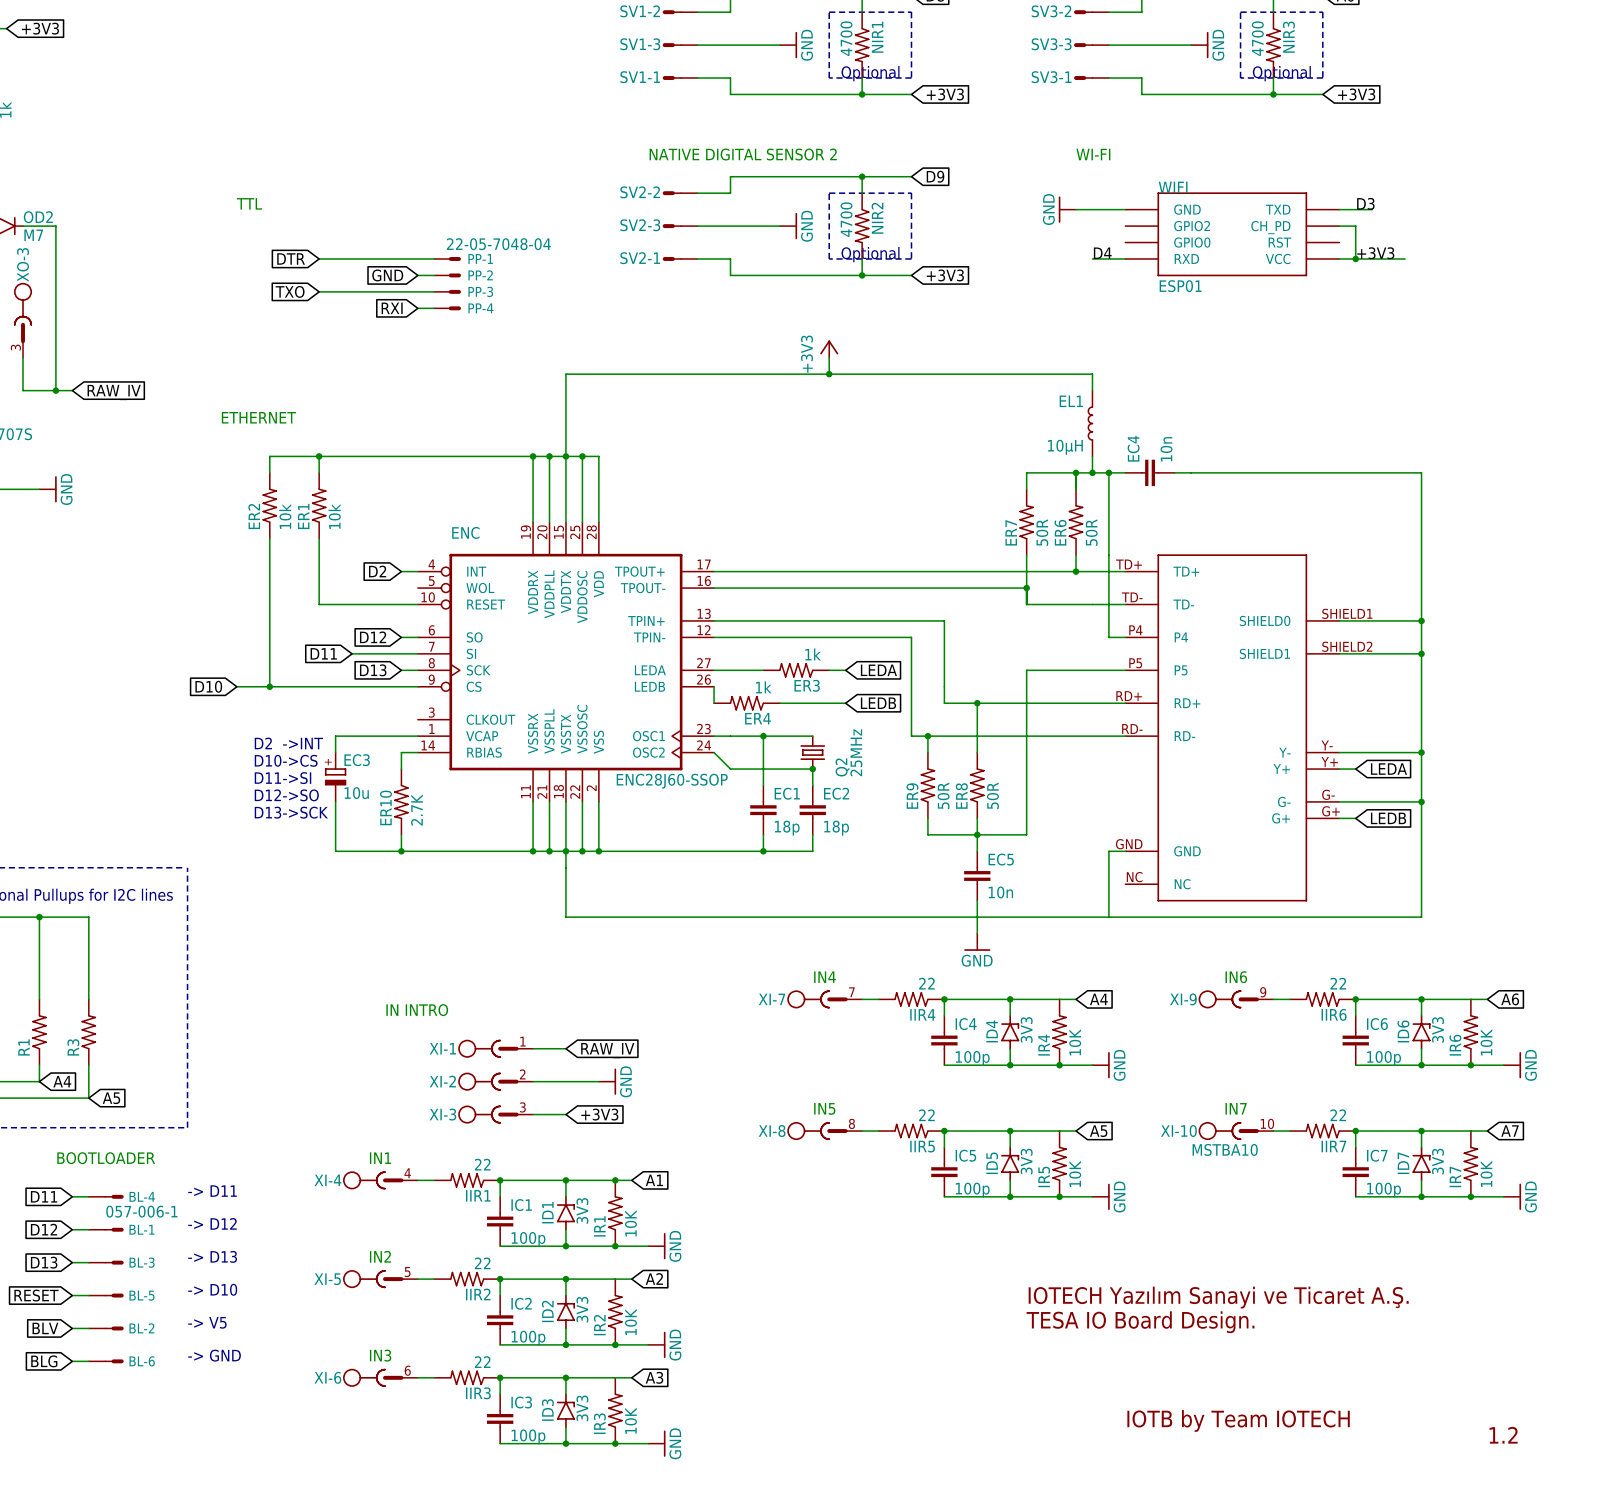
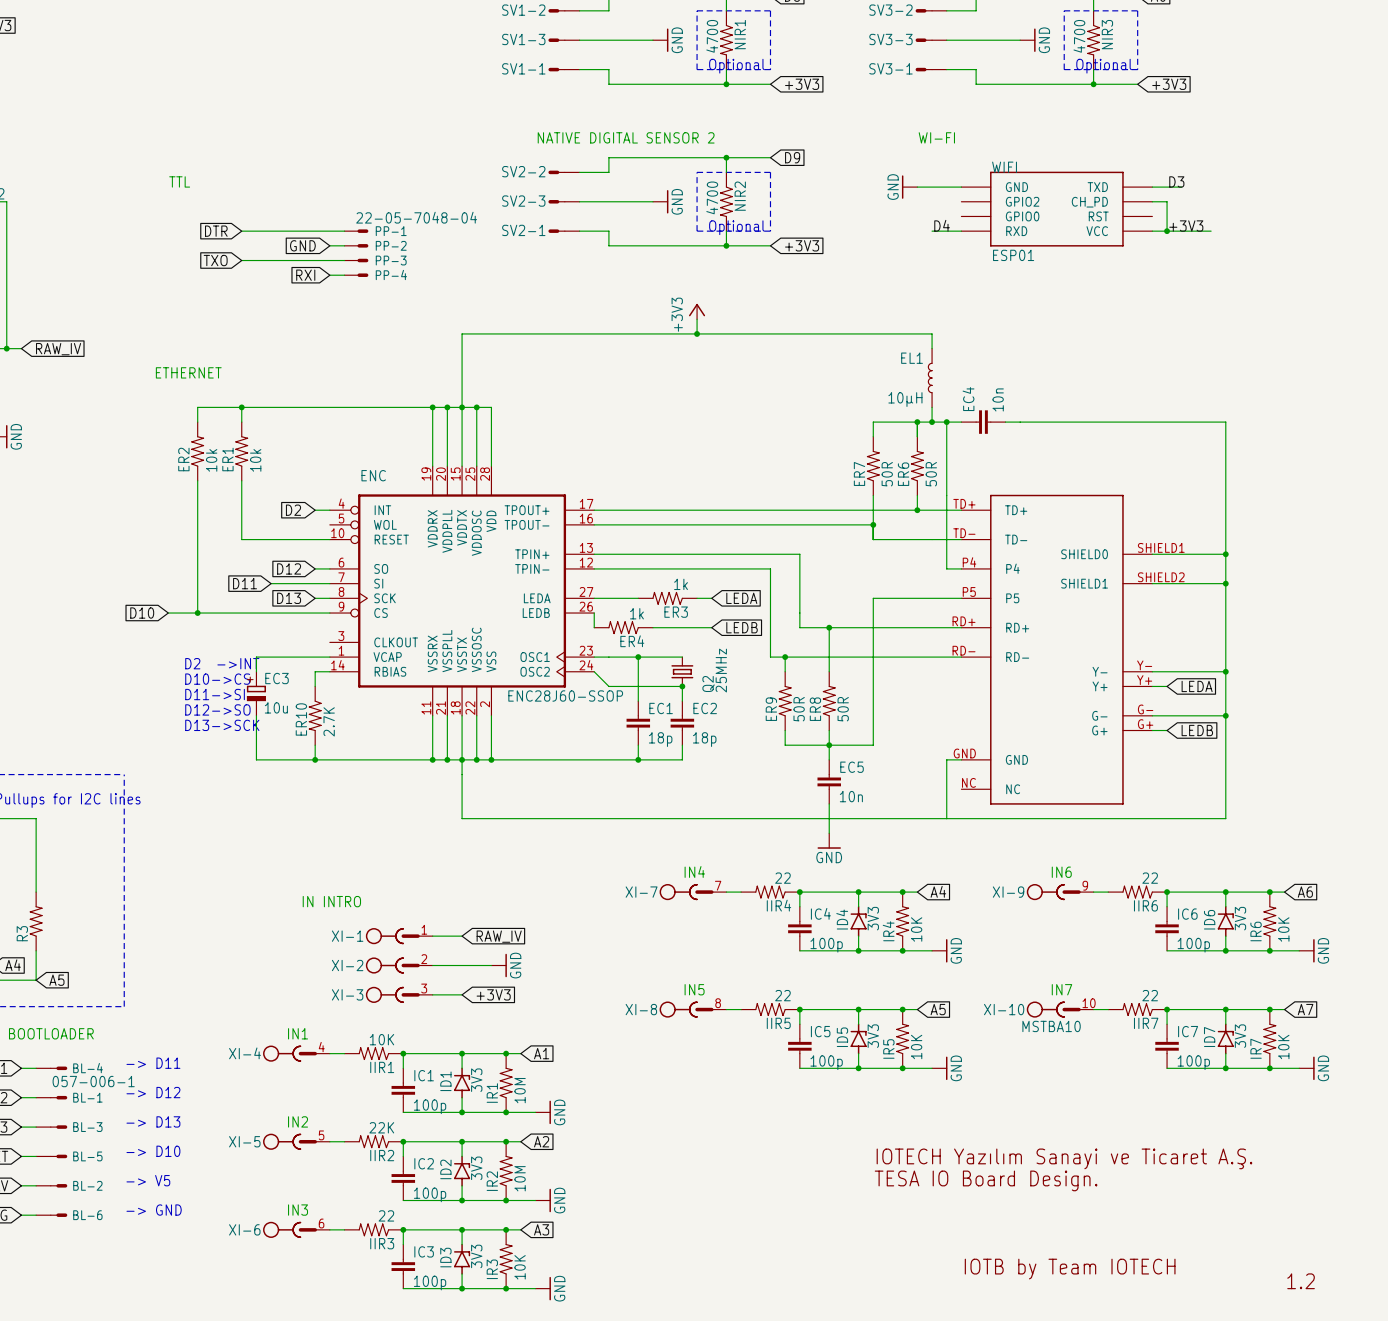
junction: none -> (902, 892)
junction: none -> (1269, 892)
junction: none -> (902, 1009)
junction: none -> (1269, 1009)
IIR1 value: 22 (482, 1164) -> 10K (381, 1039)
IR1 value: 10K (630, 1223) -> 10M (520, 1090)
IIR2 value: 22 (482, 1263) -> 22K (381, 1127)
junction: none -> (506, 1141)
IR2 value: 10K (630, 1322) -> 10M (520, 1178)
junction: none -> (506, 1229)

